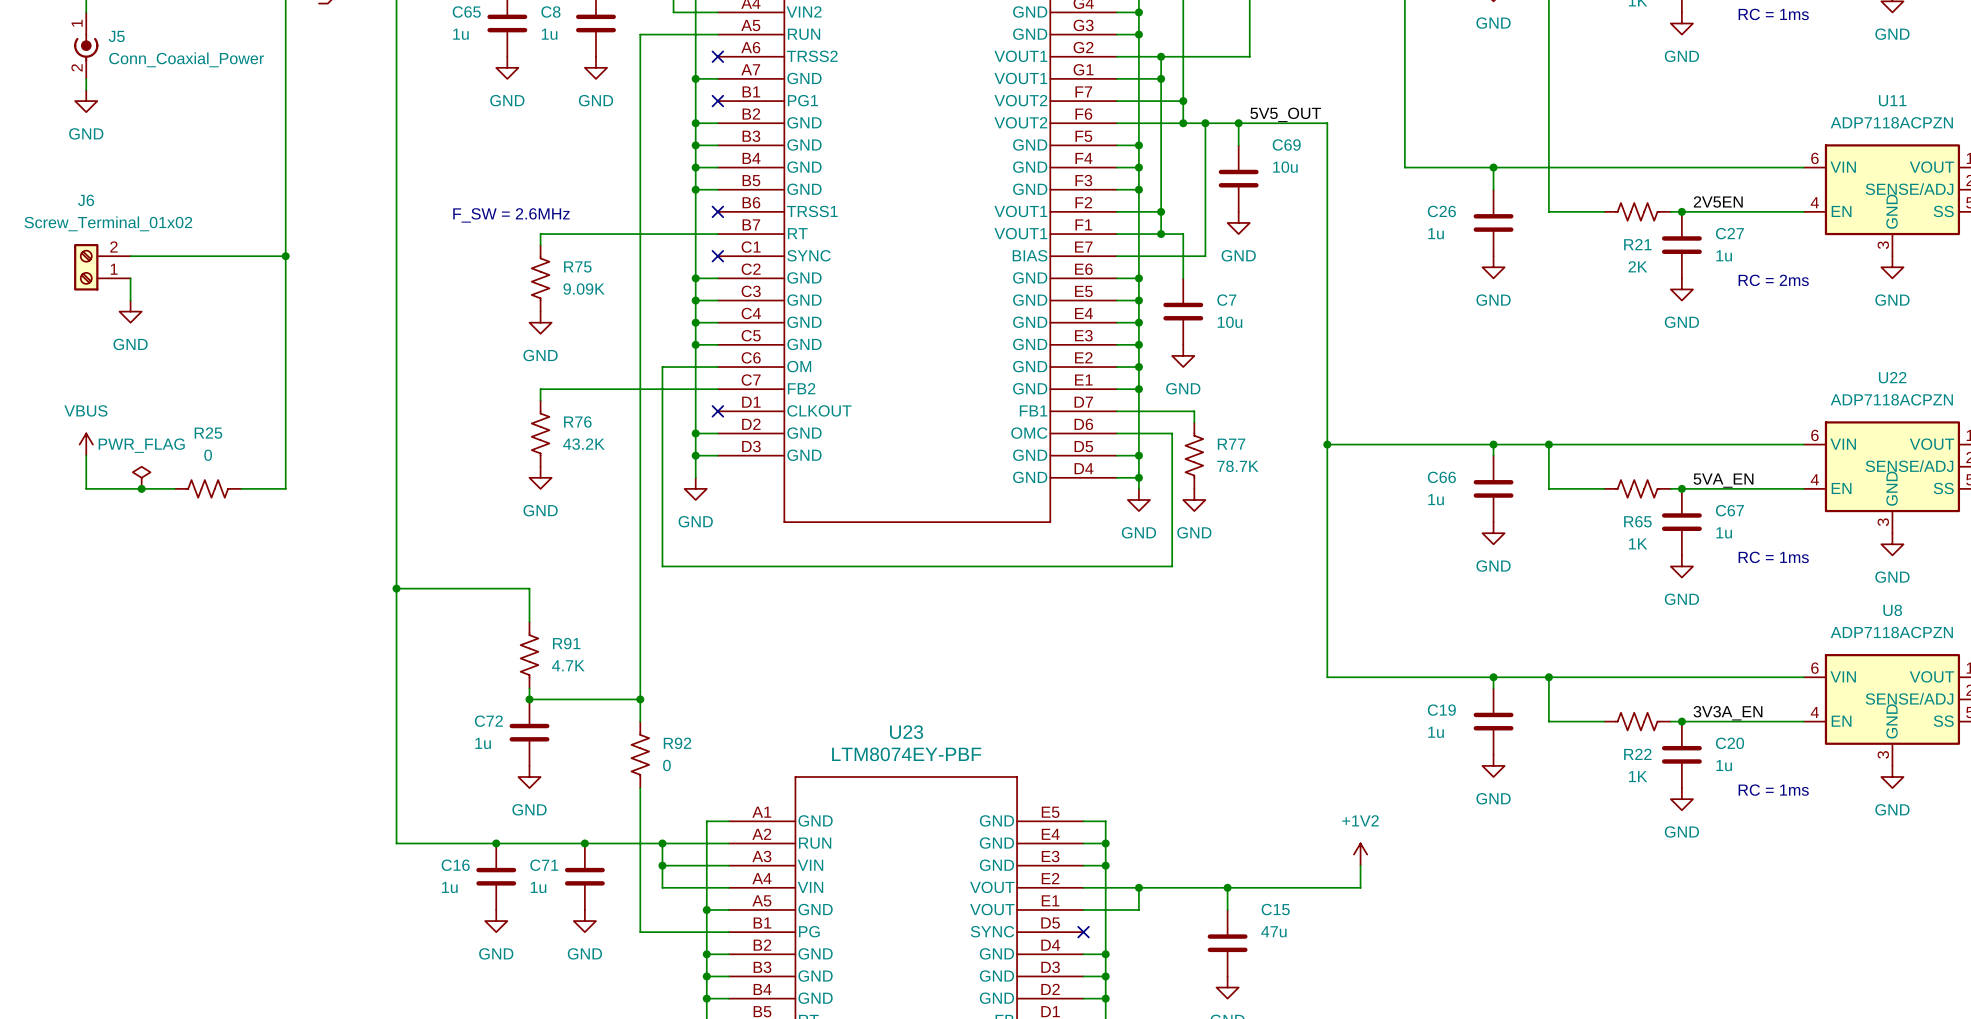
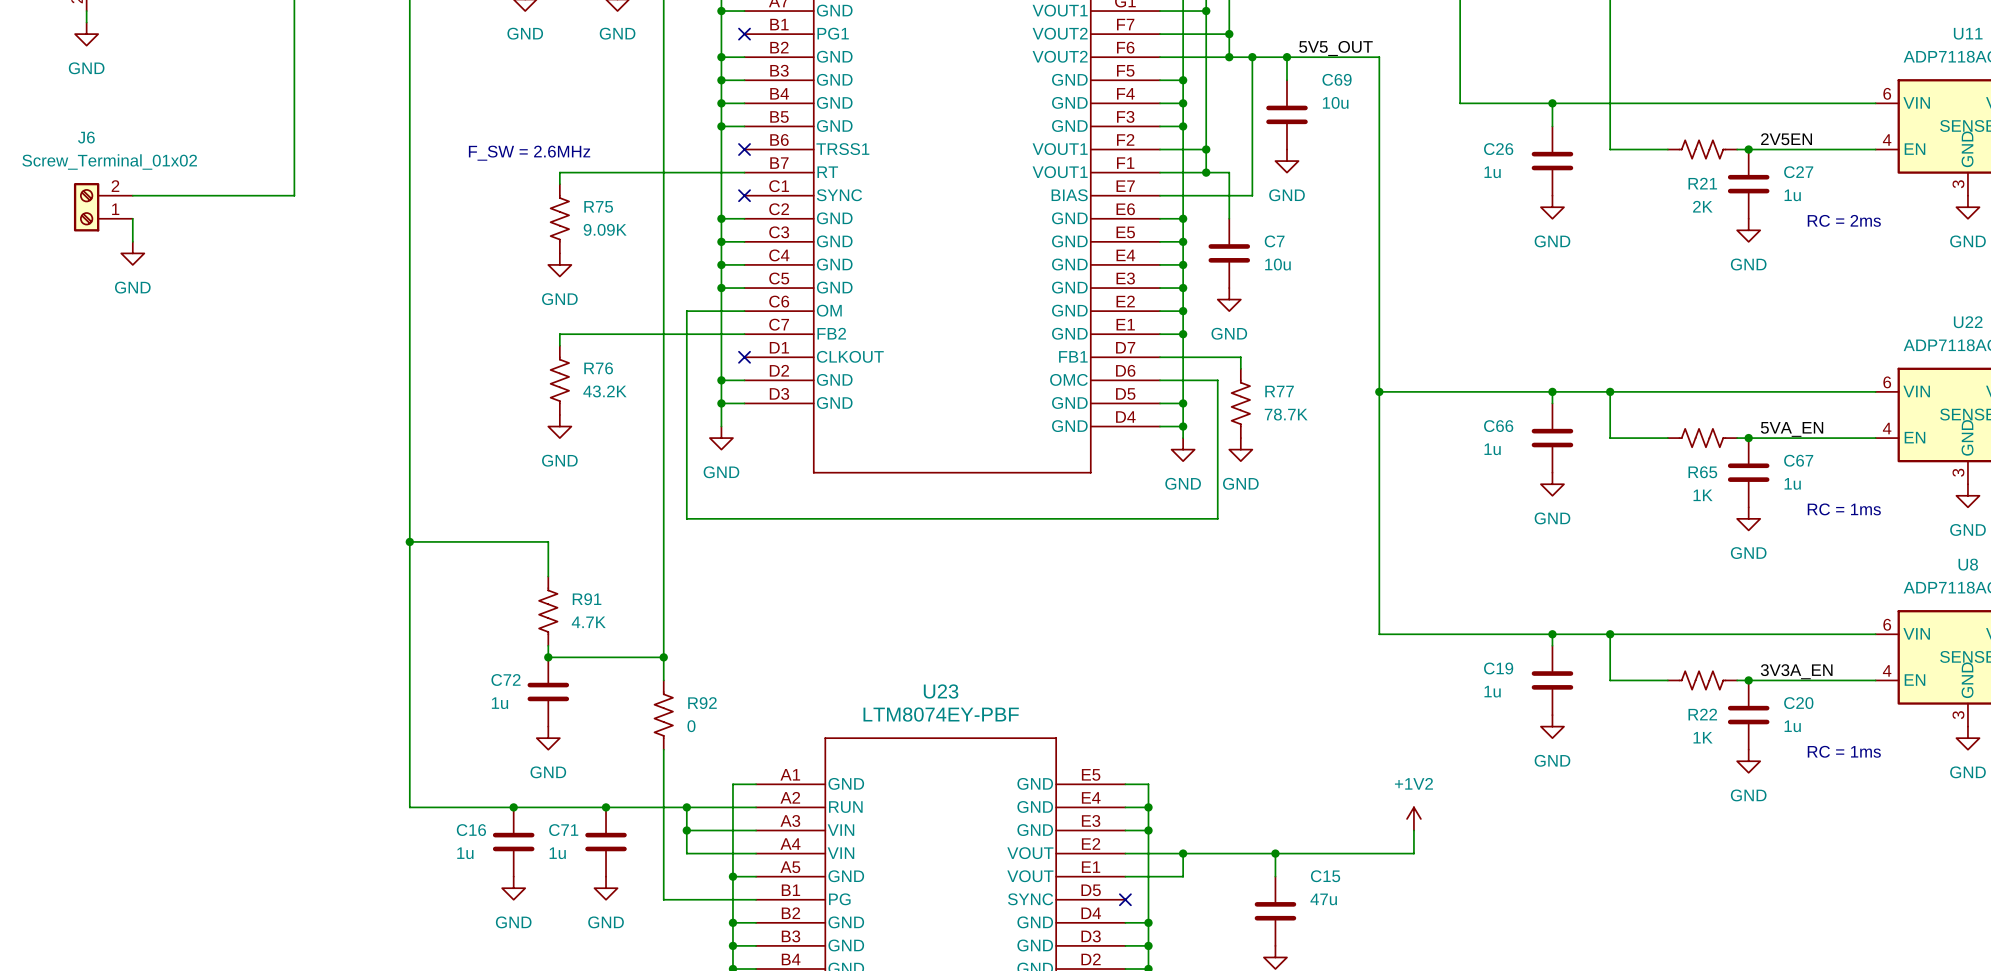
wire: (285, 256) (285, 488) (241, 488) -> none
junction: (285, 256) -> none
power symbol: VBUS (86, 444) -> none
wire: (86, 455) (86, 488) (174, 488) -> none
power symbol: PWR_FLAG (141, 477) -> none
junction: (141, 488) -> none
R25: 0 (208, 488) -> none

